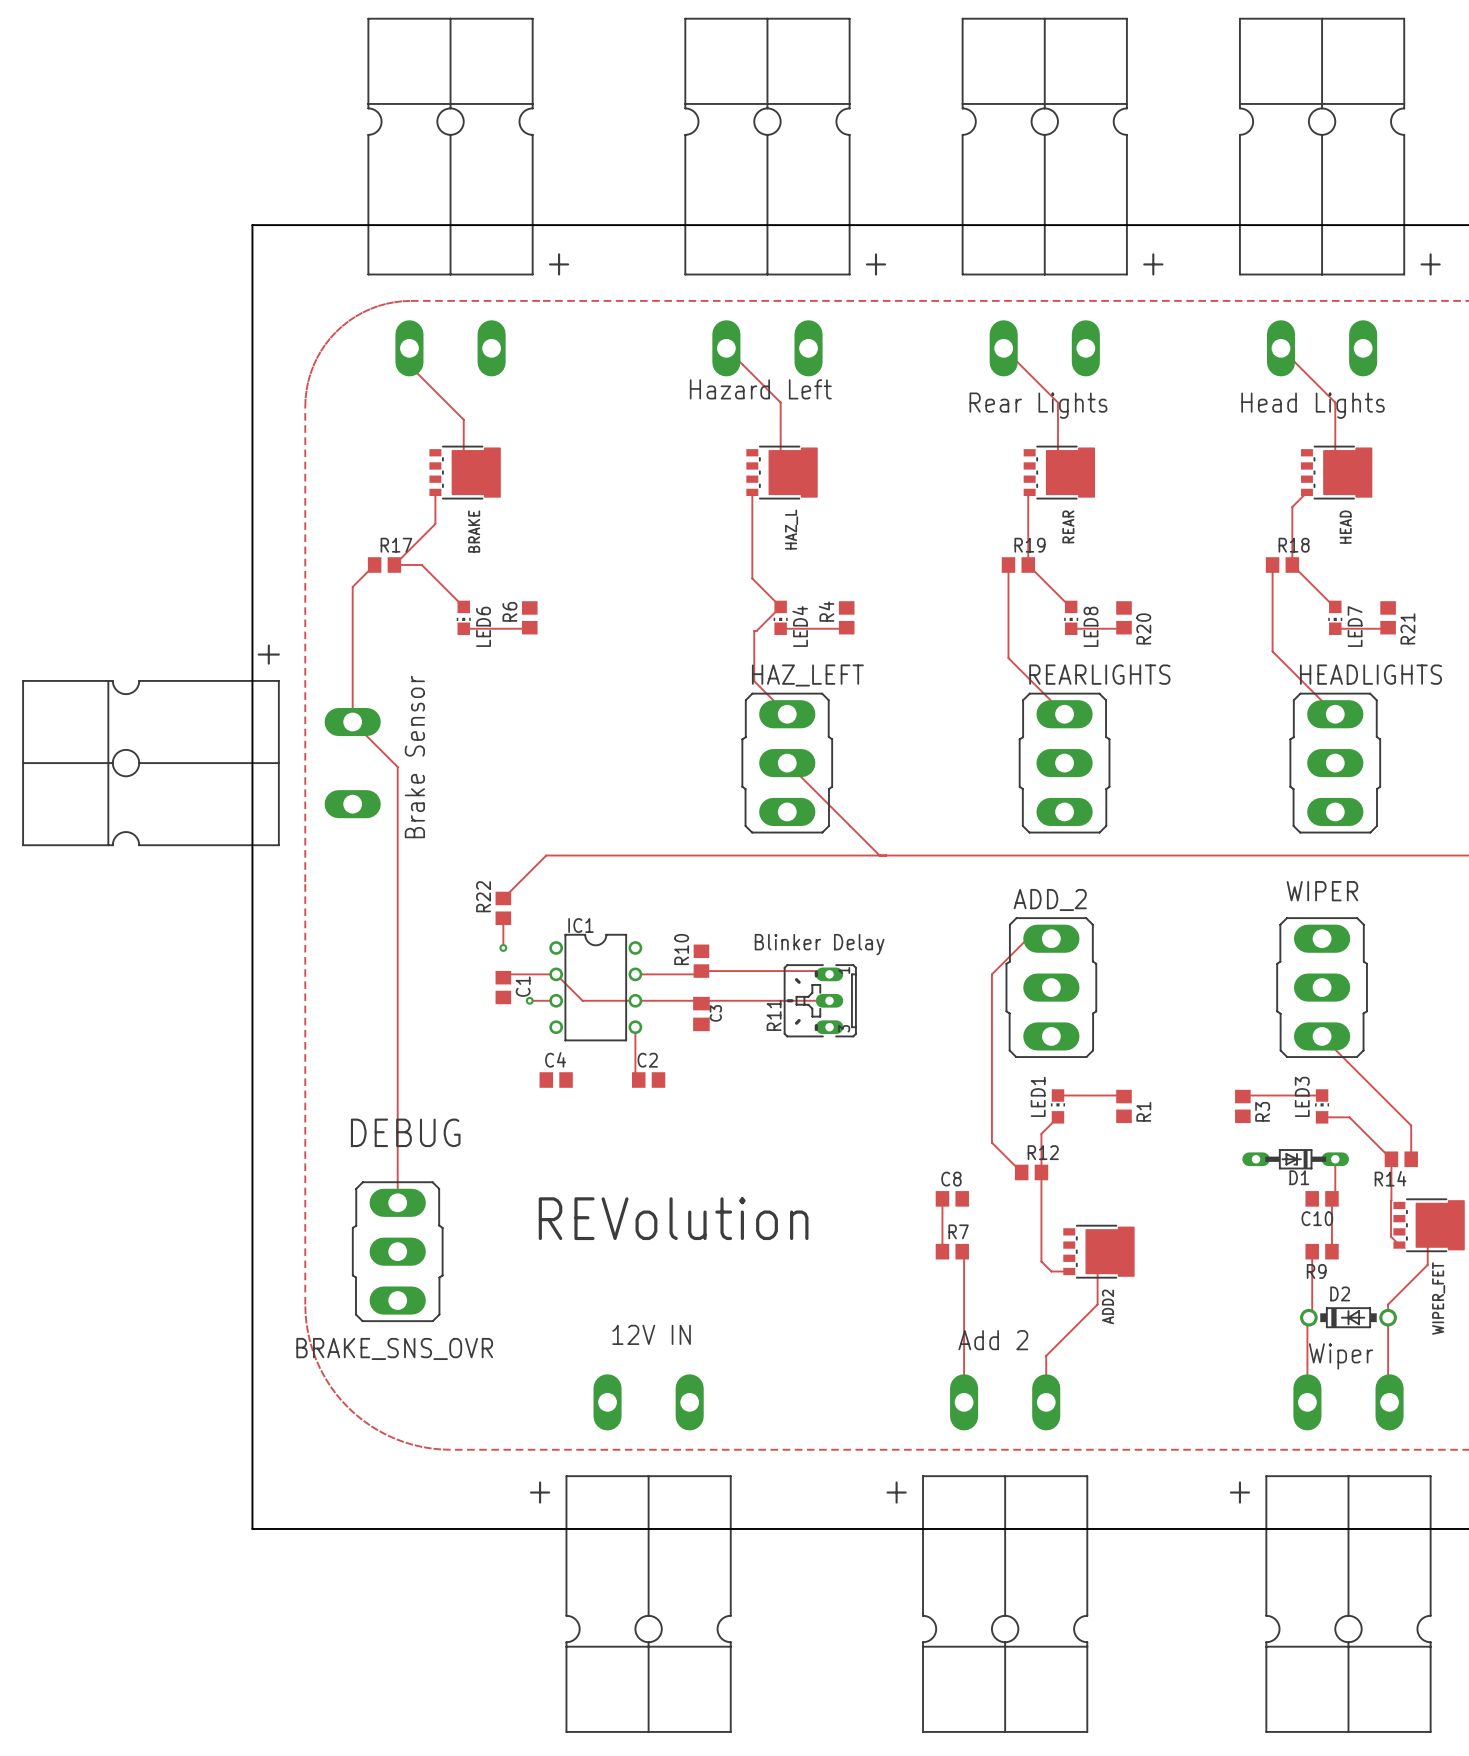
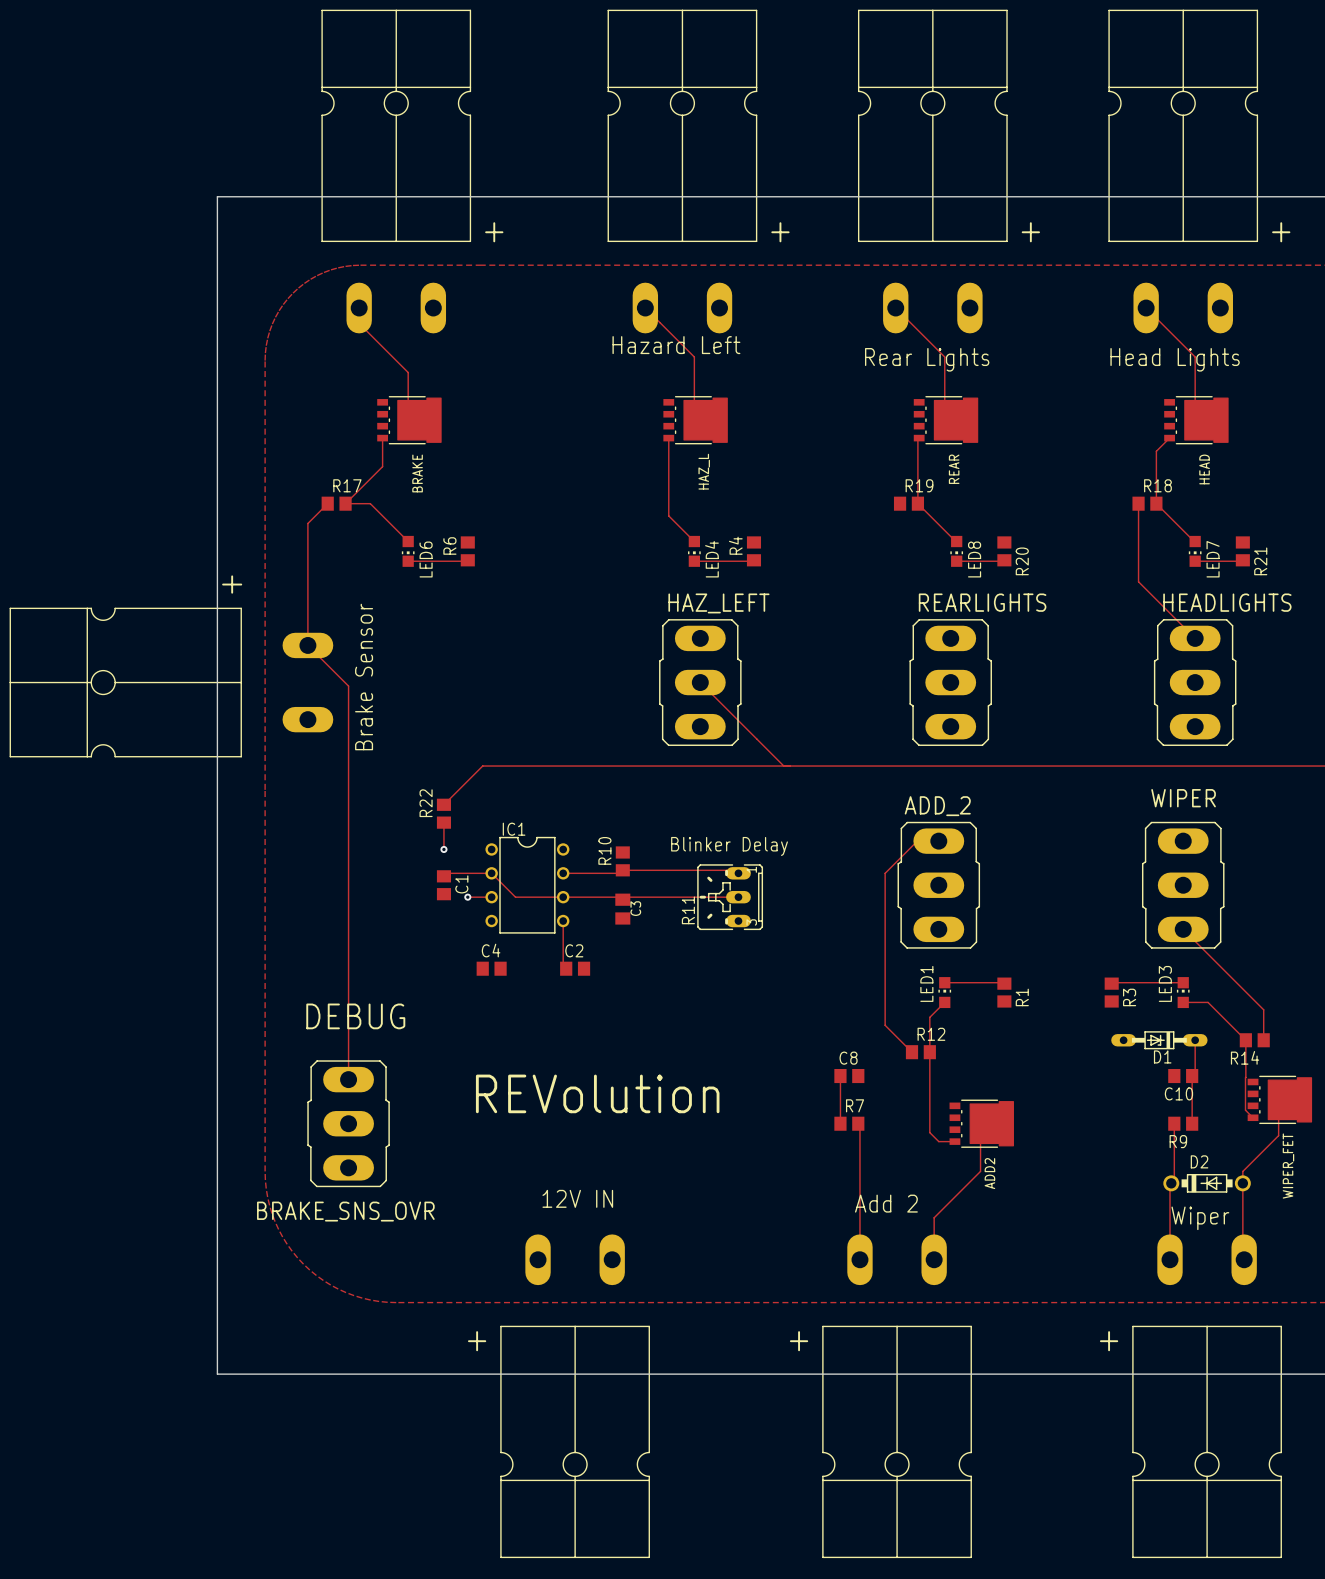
track: (1008, 565) (1008, 658) (1064, 714) -> none
track: (780, 606) (756, 631) (754, 631) (754, 681) (787, 714) -> none

